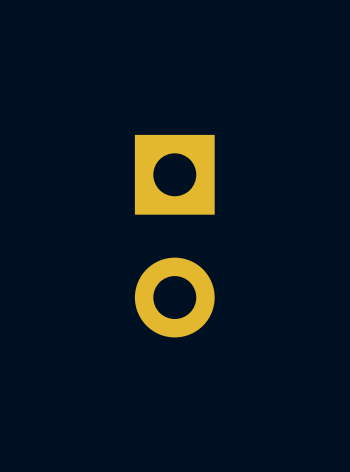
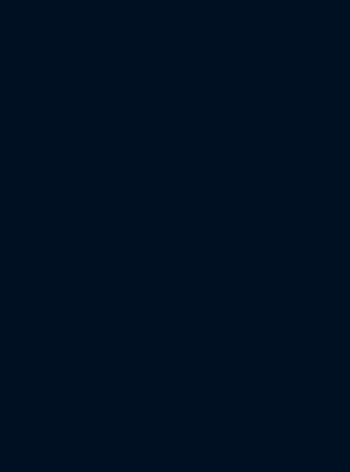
part: (174, 236) -> none

